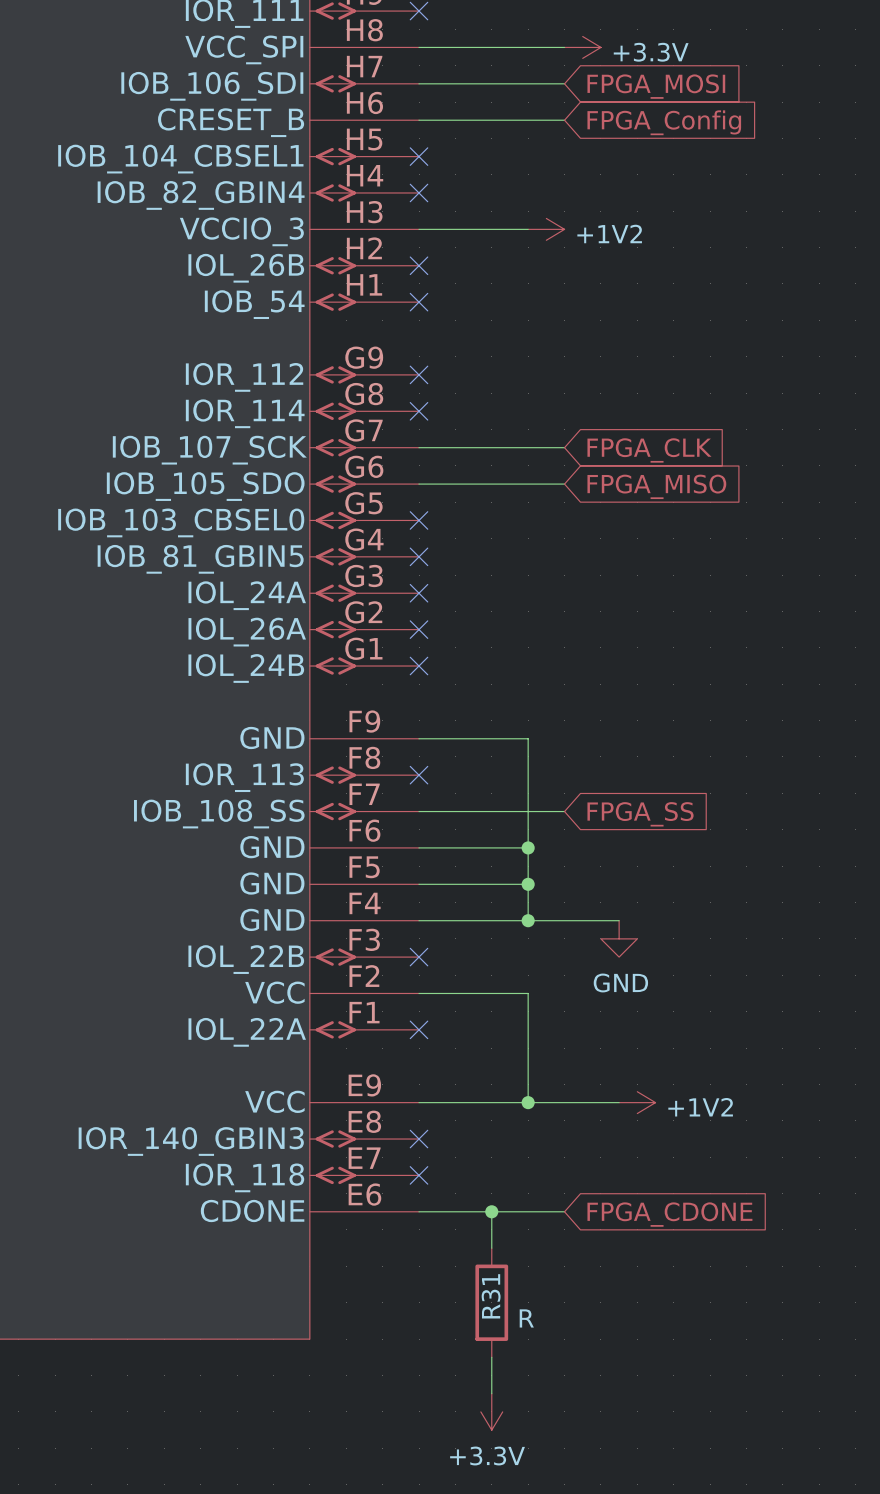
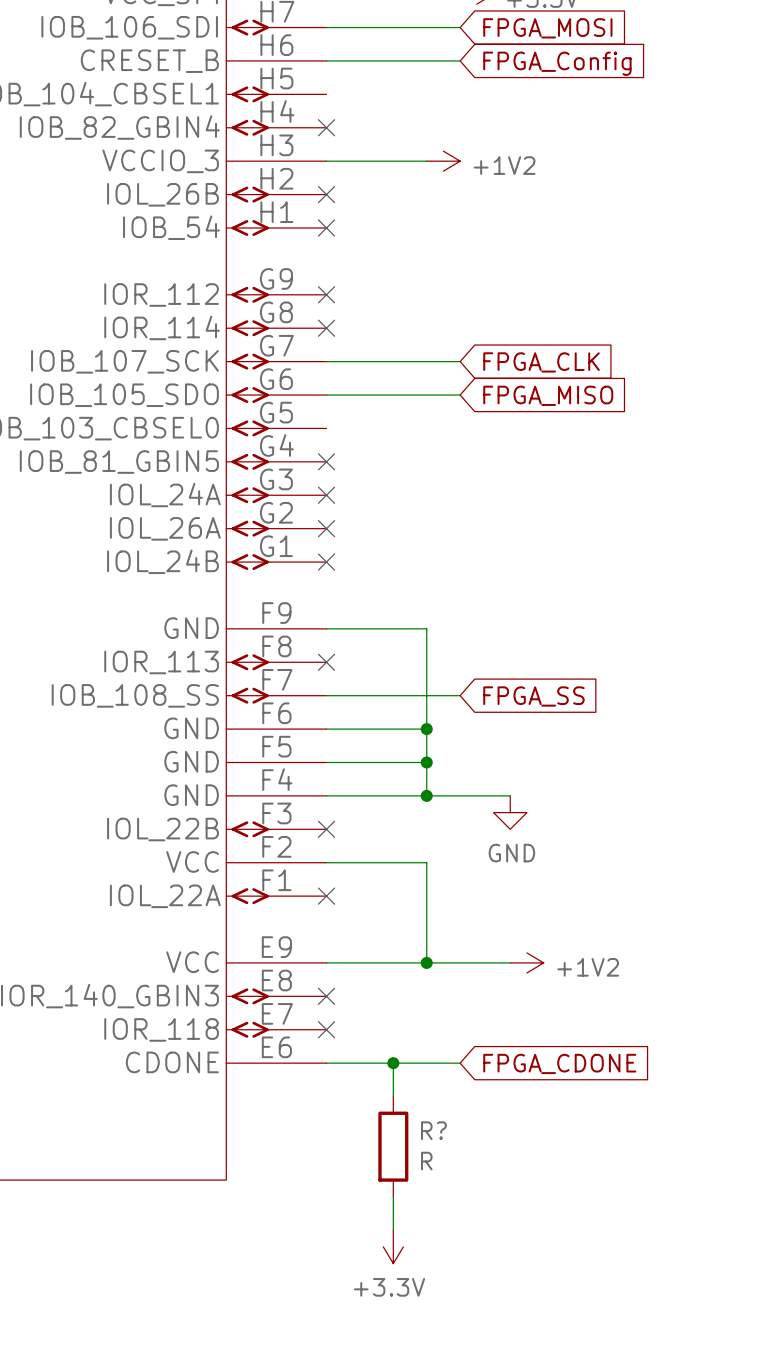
no-connect mark: (419, 156) -> none
no-connect mark: (419, 520) -> none
R31 name: R31 (491, 1296) -> R? (433, 1130)

